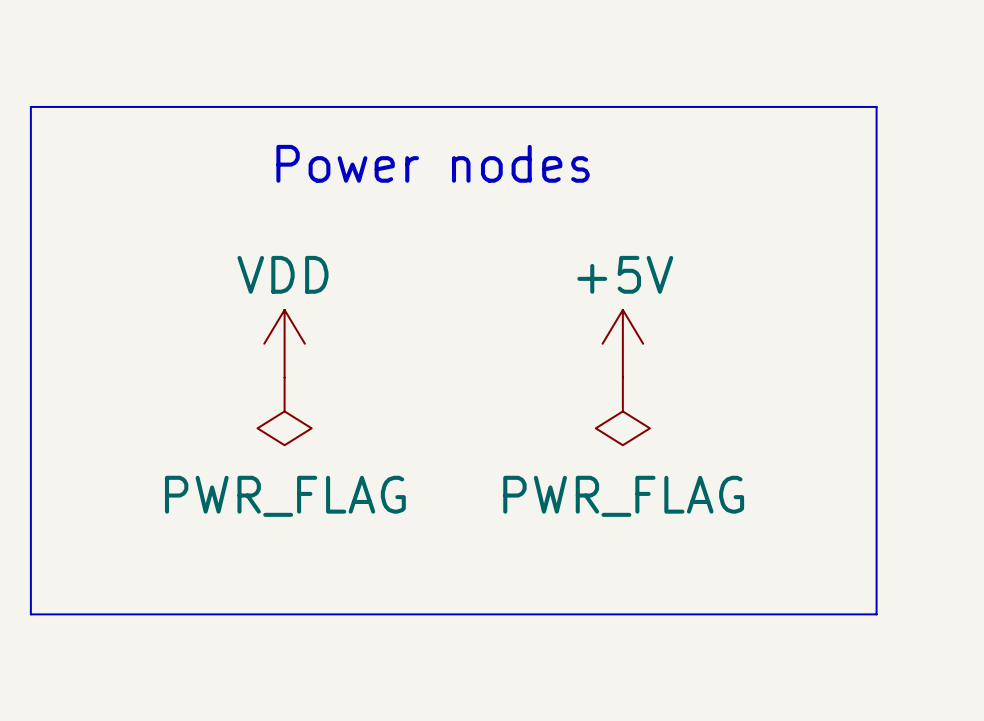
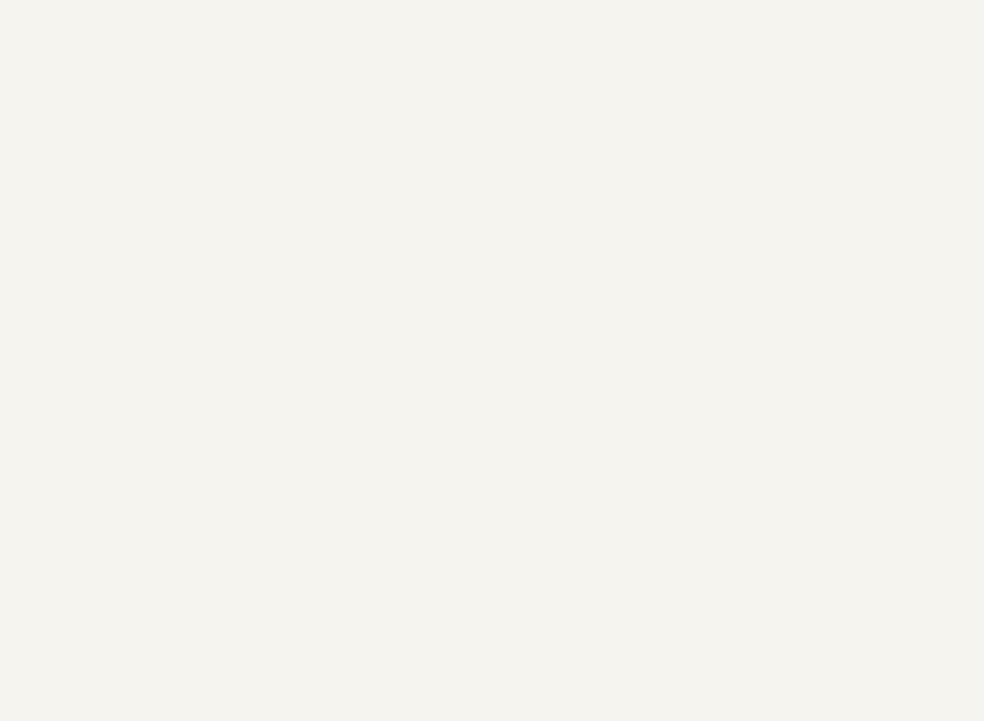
line: (30, 106) (876, 106) (876, 614) (30, 614) (30, 106) -> none
text: Power nodes (433, 163) -> none
power symbol: VDD (284, 343) -> none
power symbol: +5V (622, 343) -> none
power symbol: PWR_FLAG (284, 411) -> none
power symbol: PWR_FLAG (622, 411) -> none

